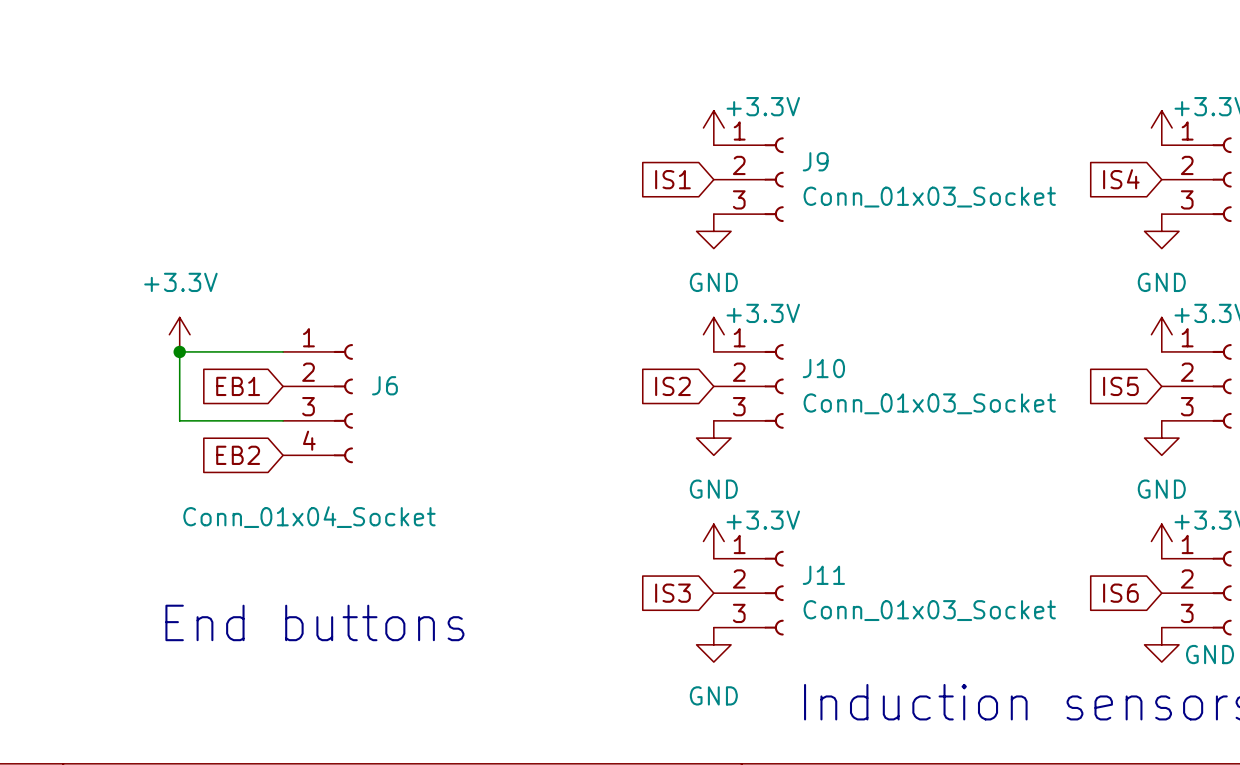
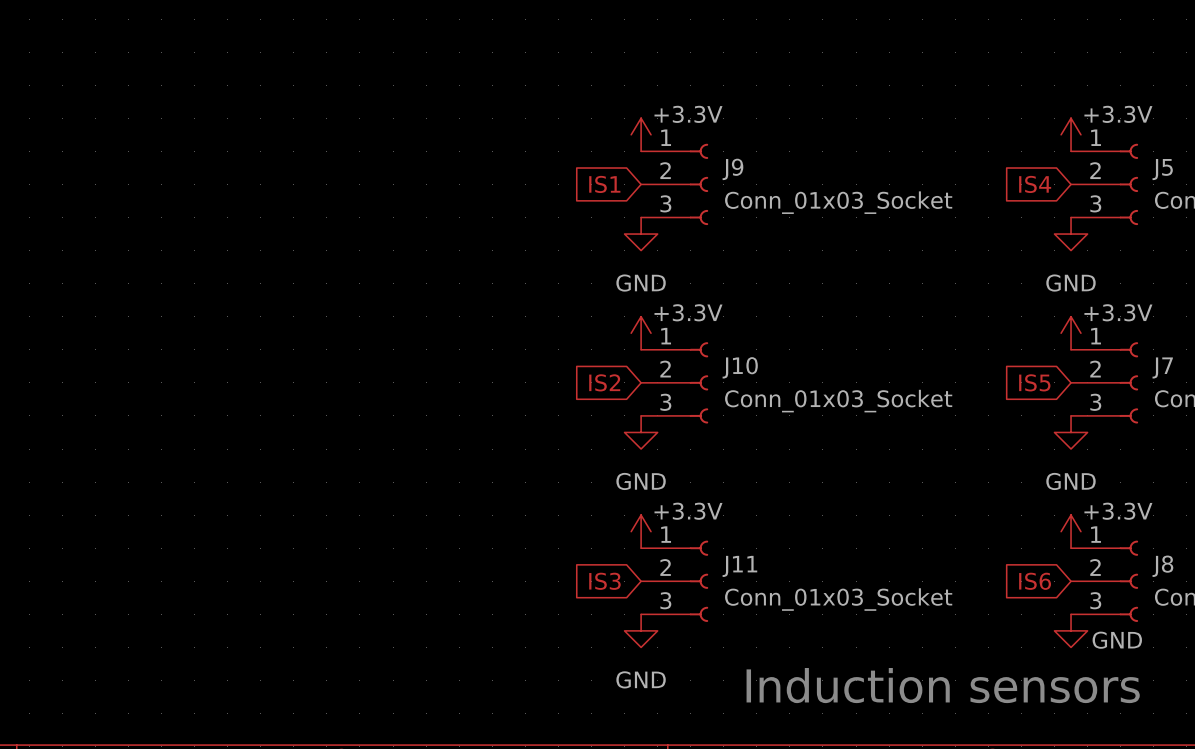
power symbol: +3.3V (179, 334) -> none
junction: (179, 351) -> none
wire: (283, 351) (179, 351) (179, 420) (283, 420) -> none
global label: EB1 (238, 386) -> none
J6: Conn_01x04_Socket (318, 403) -> none
global label: EB2 (238, 455) -> none
text: End buttons (314, 622) -> none

